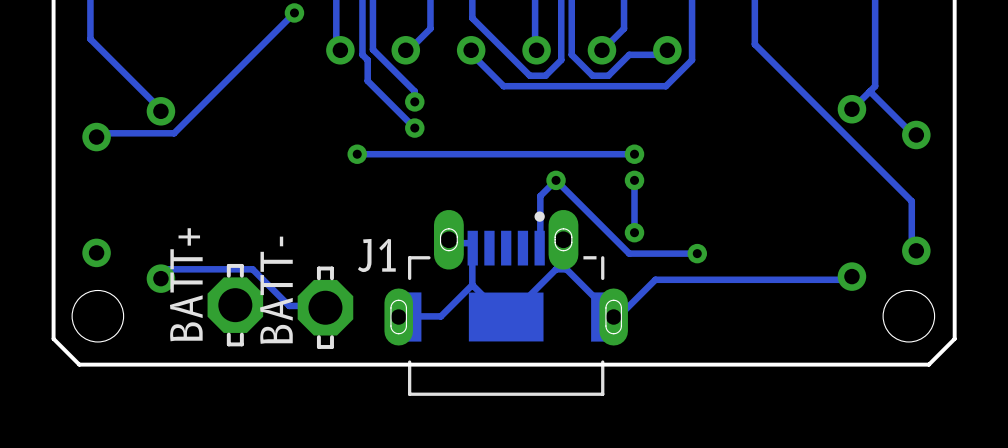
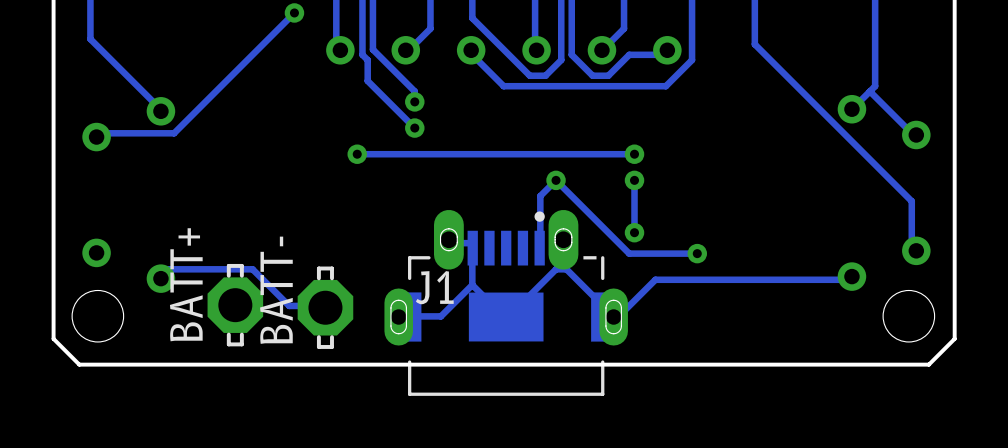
J1 name position: J1 (376, 255) -> J1 (434, 287)

